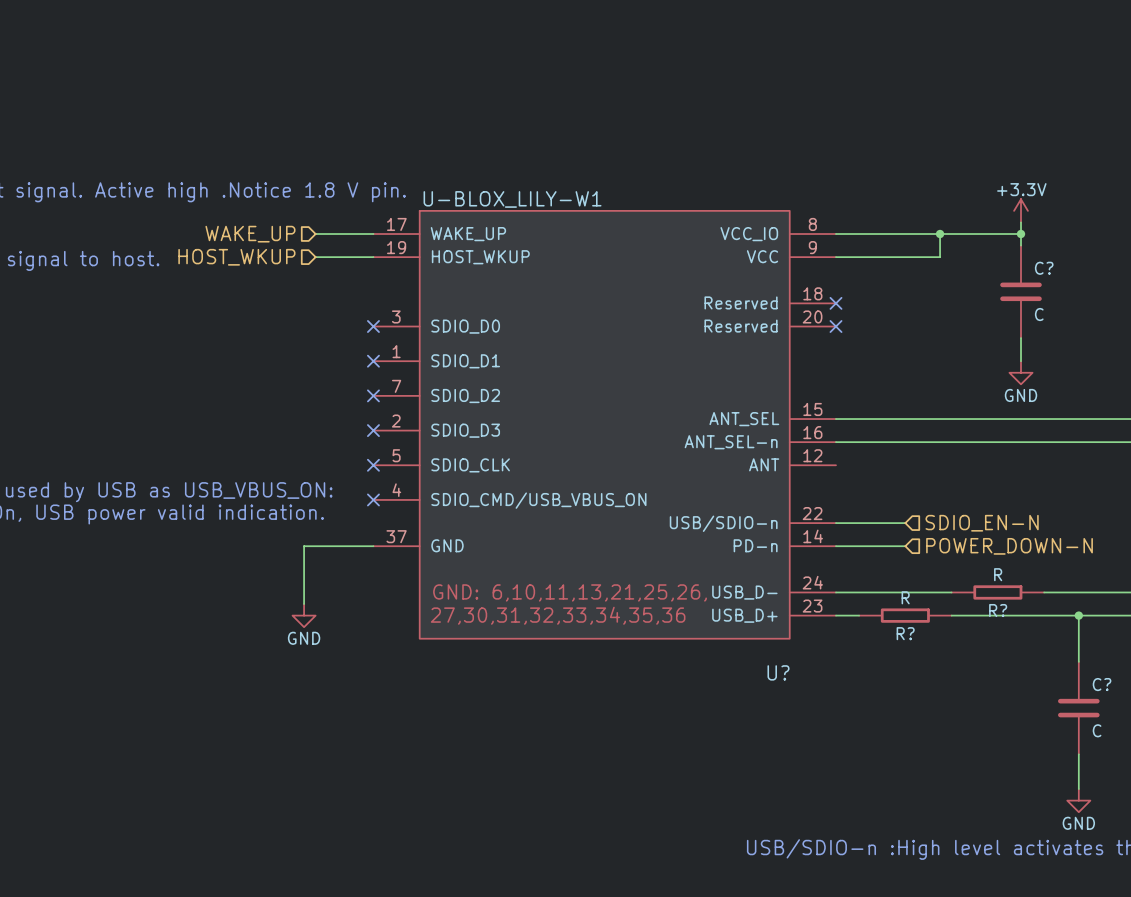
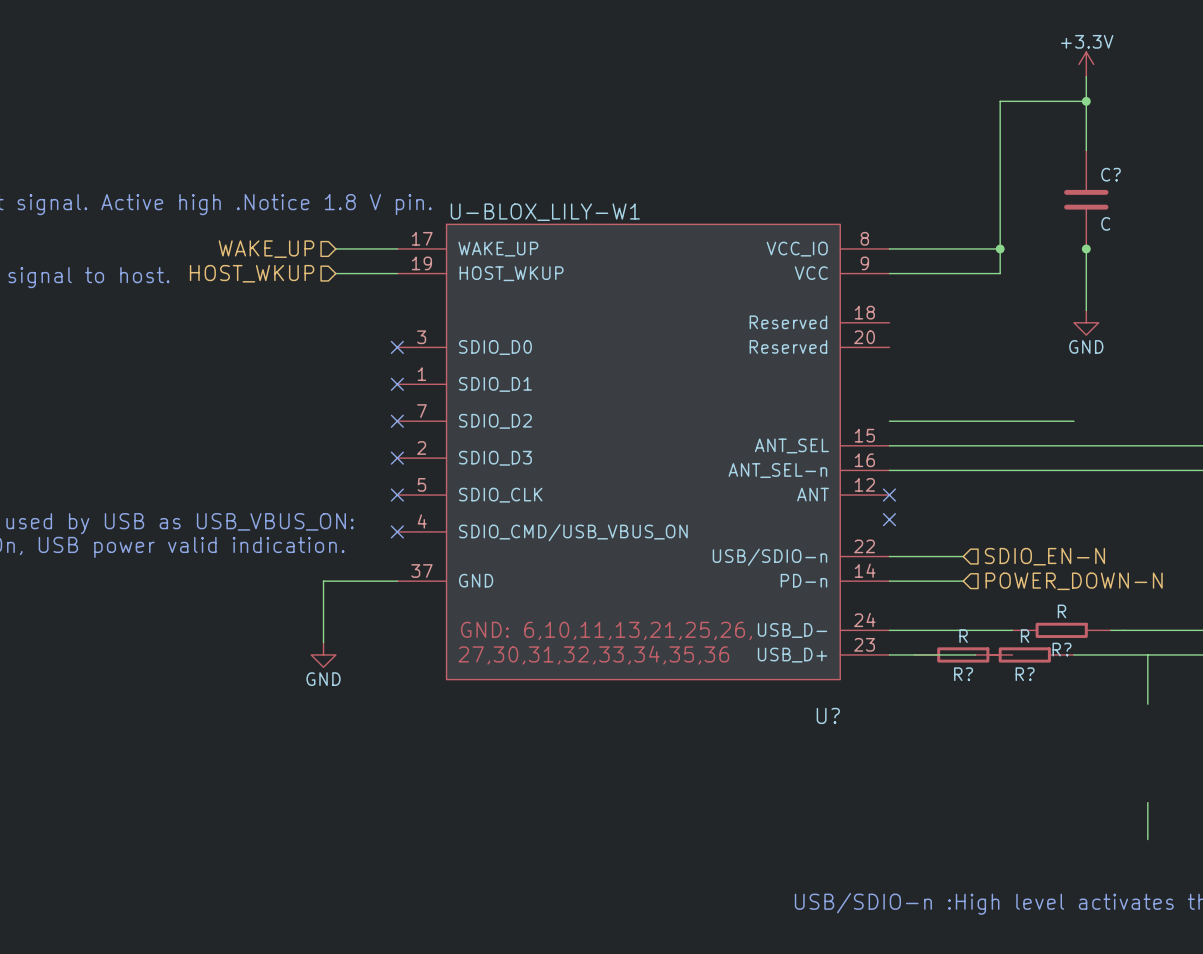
wire: none -> (1086, 76) (1086, 150)
junction: none -> (1086, 101)
power symbol position: +3.3V (1021, 210) -> +3.3V (1086, 64)
wire: (1021, 222) (1021, 234) (940, 234) -> (1086, 101) (1000, 101) (1000, 248)
C? position: (1021, 291) -> (1086, 199)
no-connect mark: (835, 303) -> none
no-connect mark: (835, 326) -> none
wire: (1021, 338) (1021, 361) -> none
power symbol position: GND (1021, 372) -> GND (1086, 322)
wire: none -> (889, 421) (1074, 421)
no-connect mark: none -> (889, 495)
no-connect mark: none -> (889, 519)
wire: (951, 615) (1009, 615) -> (914, 654) (975, 654)
R?: none -> R (1024, 654)
junction: (1078, 615) -> none
C?: C (1078, 708) -> none
power symbol: GND (1078, 800) -> none

